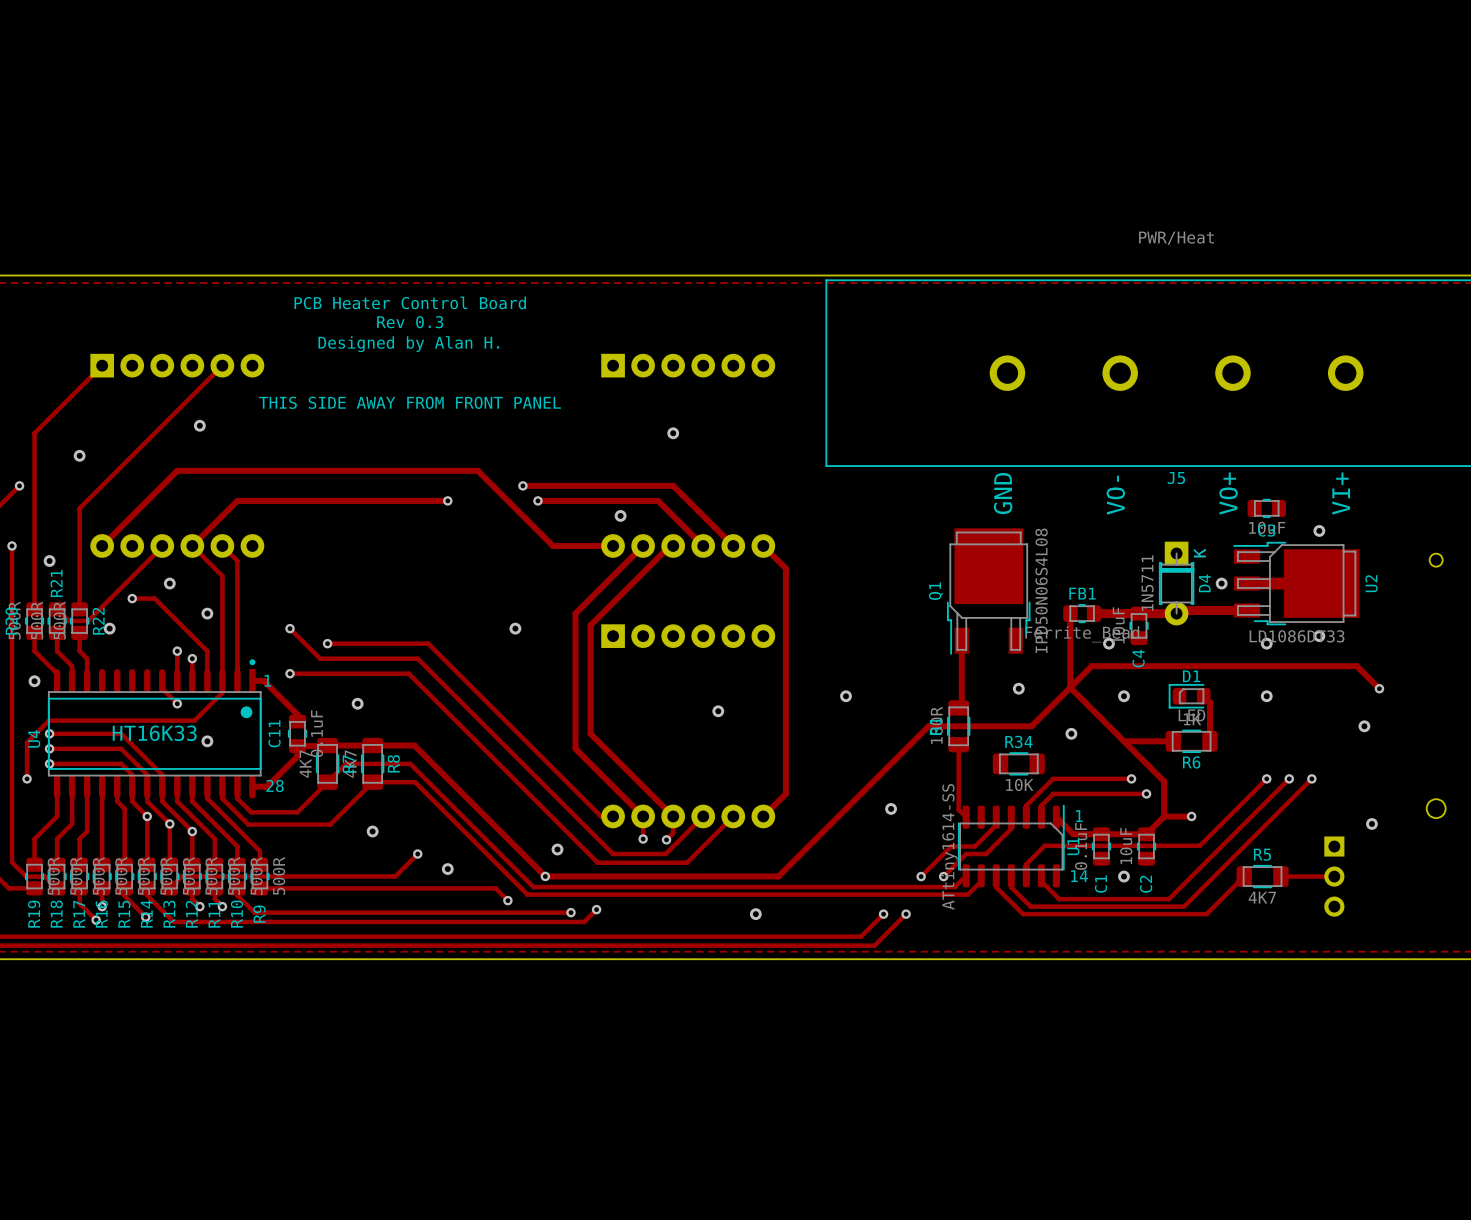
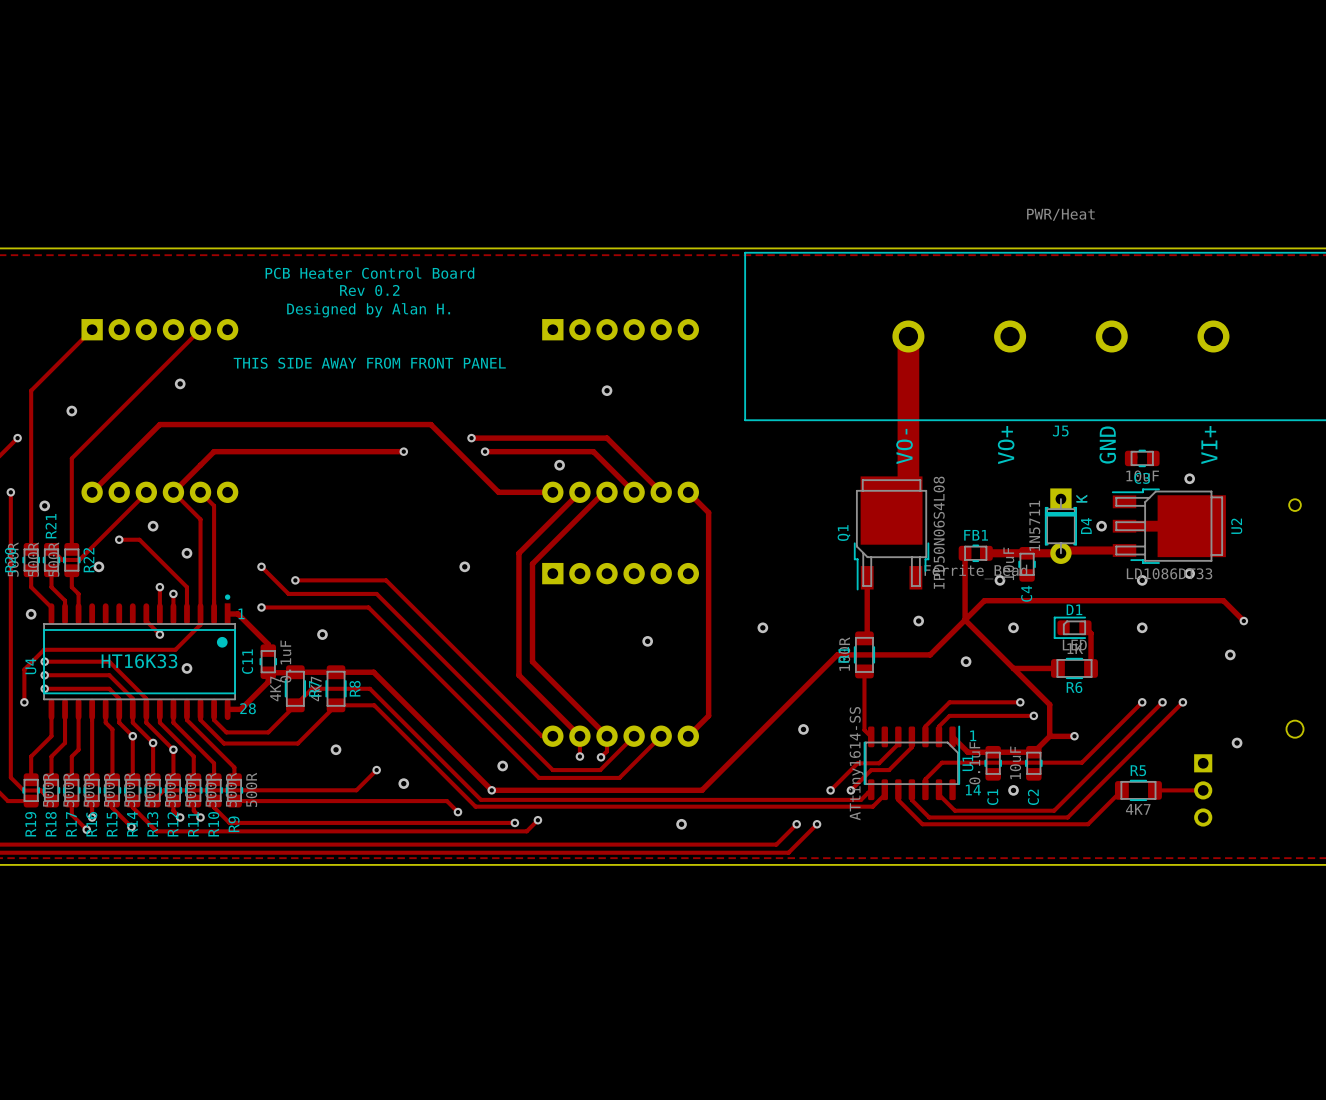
text: Rev 0.3 (410, 322) -> Rev 0.2 (369, 290)
track: none -> (908, 336) (908, 493) (891, 510)
text: GND (1003, 493) -> VO- (904, 446)
text: VO+ (1228, 493) -> GND (1107, 445)
text: VO- (1115, 495) -> VO+ (1006, 445)
R34: 10K (1018, 763) -> none

